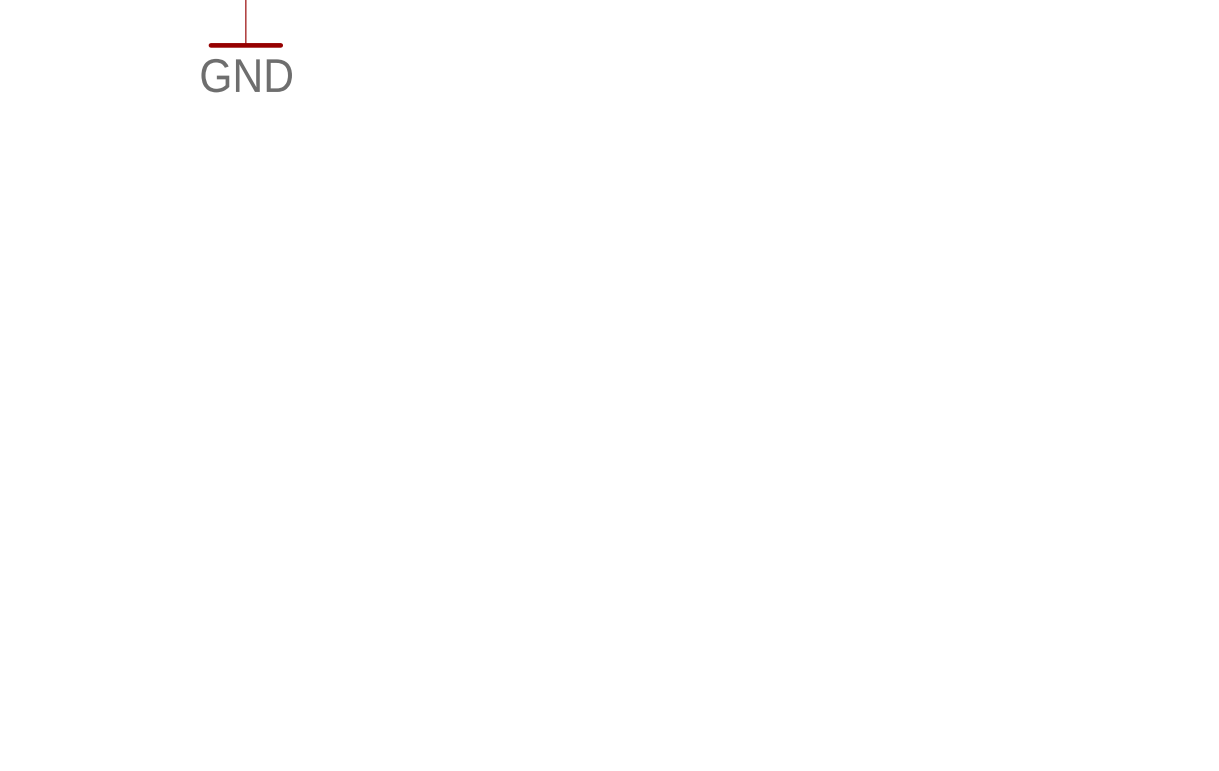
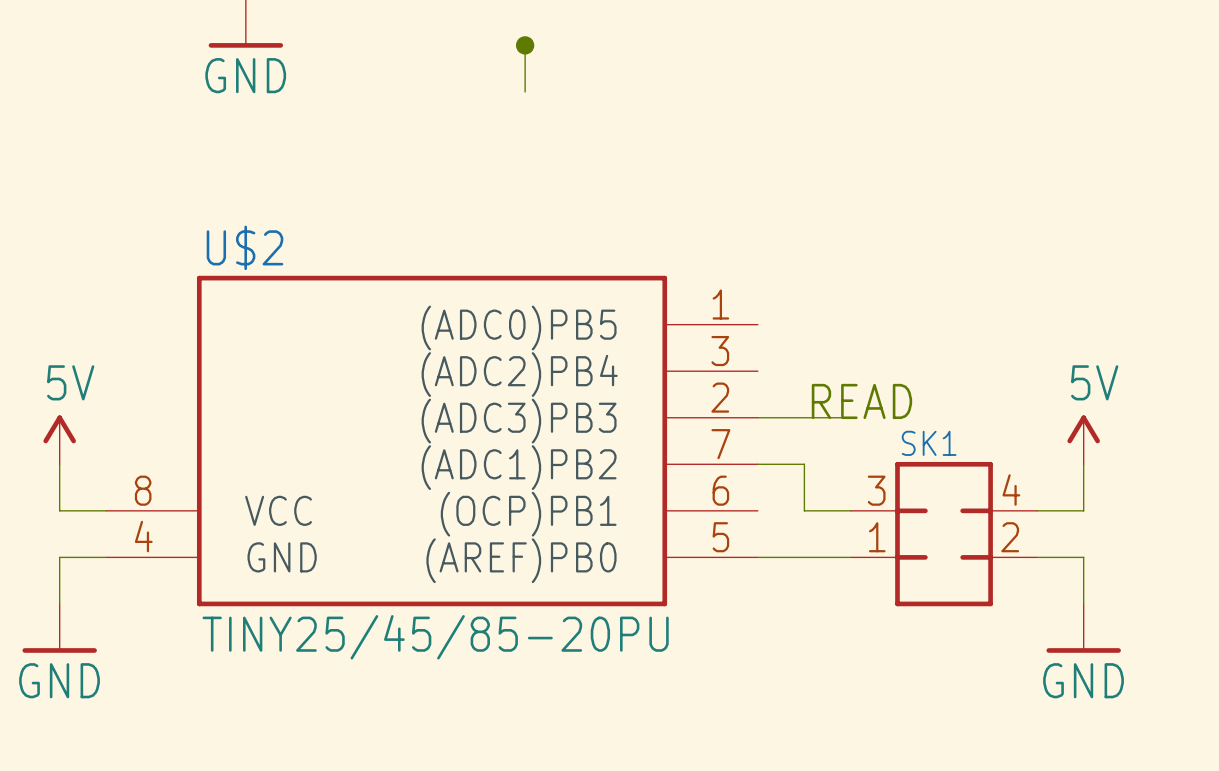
wire: none -> (525, 45) (525, 91)
junction: none -> (525, 45)
text: none -> READ (861, 401)
wire: none -> (757, 417) (850, 417)
power symbol: none -> 5V (59, 439)
power symbol: none -> 5V (1083, 439)
U$2: none -> TINY25/45/85-20PU (432, 441)
wire: none -> (59, 464) (59, 510) (106, 510)
wire: none -> (757, 464) (804, 464) (804, 510) (850, 510)
wire: none -> (1083, 464) (1083, 510) (1037, 510)
SK1: none -> (944, 534)
wire: none -> (106, 557) (59, 557) (59, 603)
wire: none -> (757, 557) (850, 557)
wire: none -> (1037, 557) (1083, 557) (1083, 603)
power symbol: none -> GND (59, 628)
power symbol: none -> GND (1083, 628)

